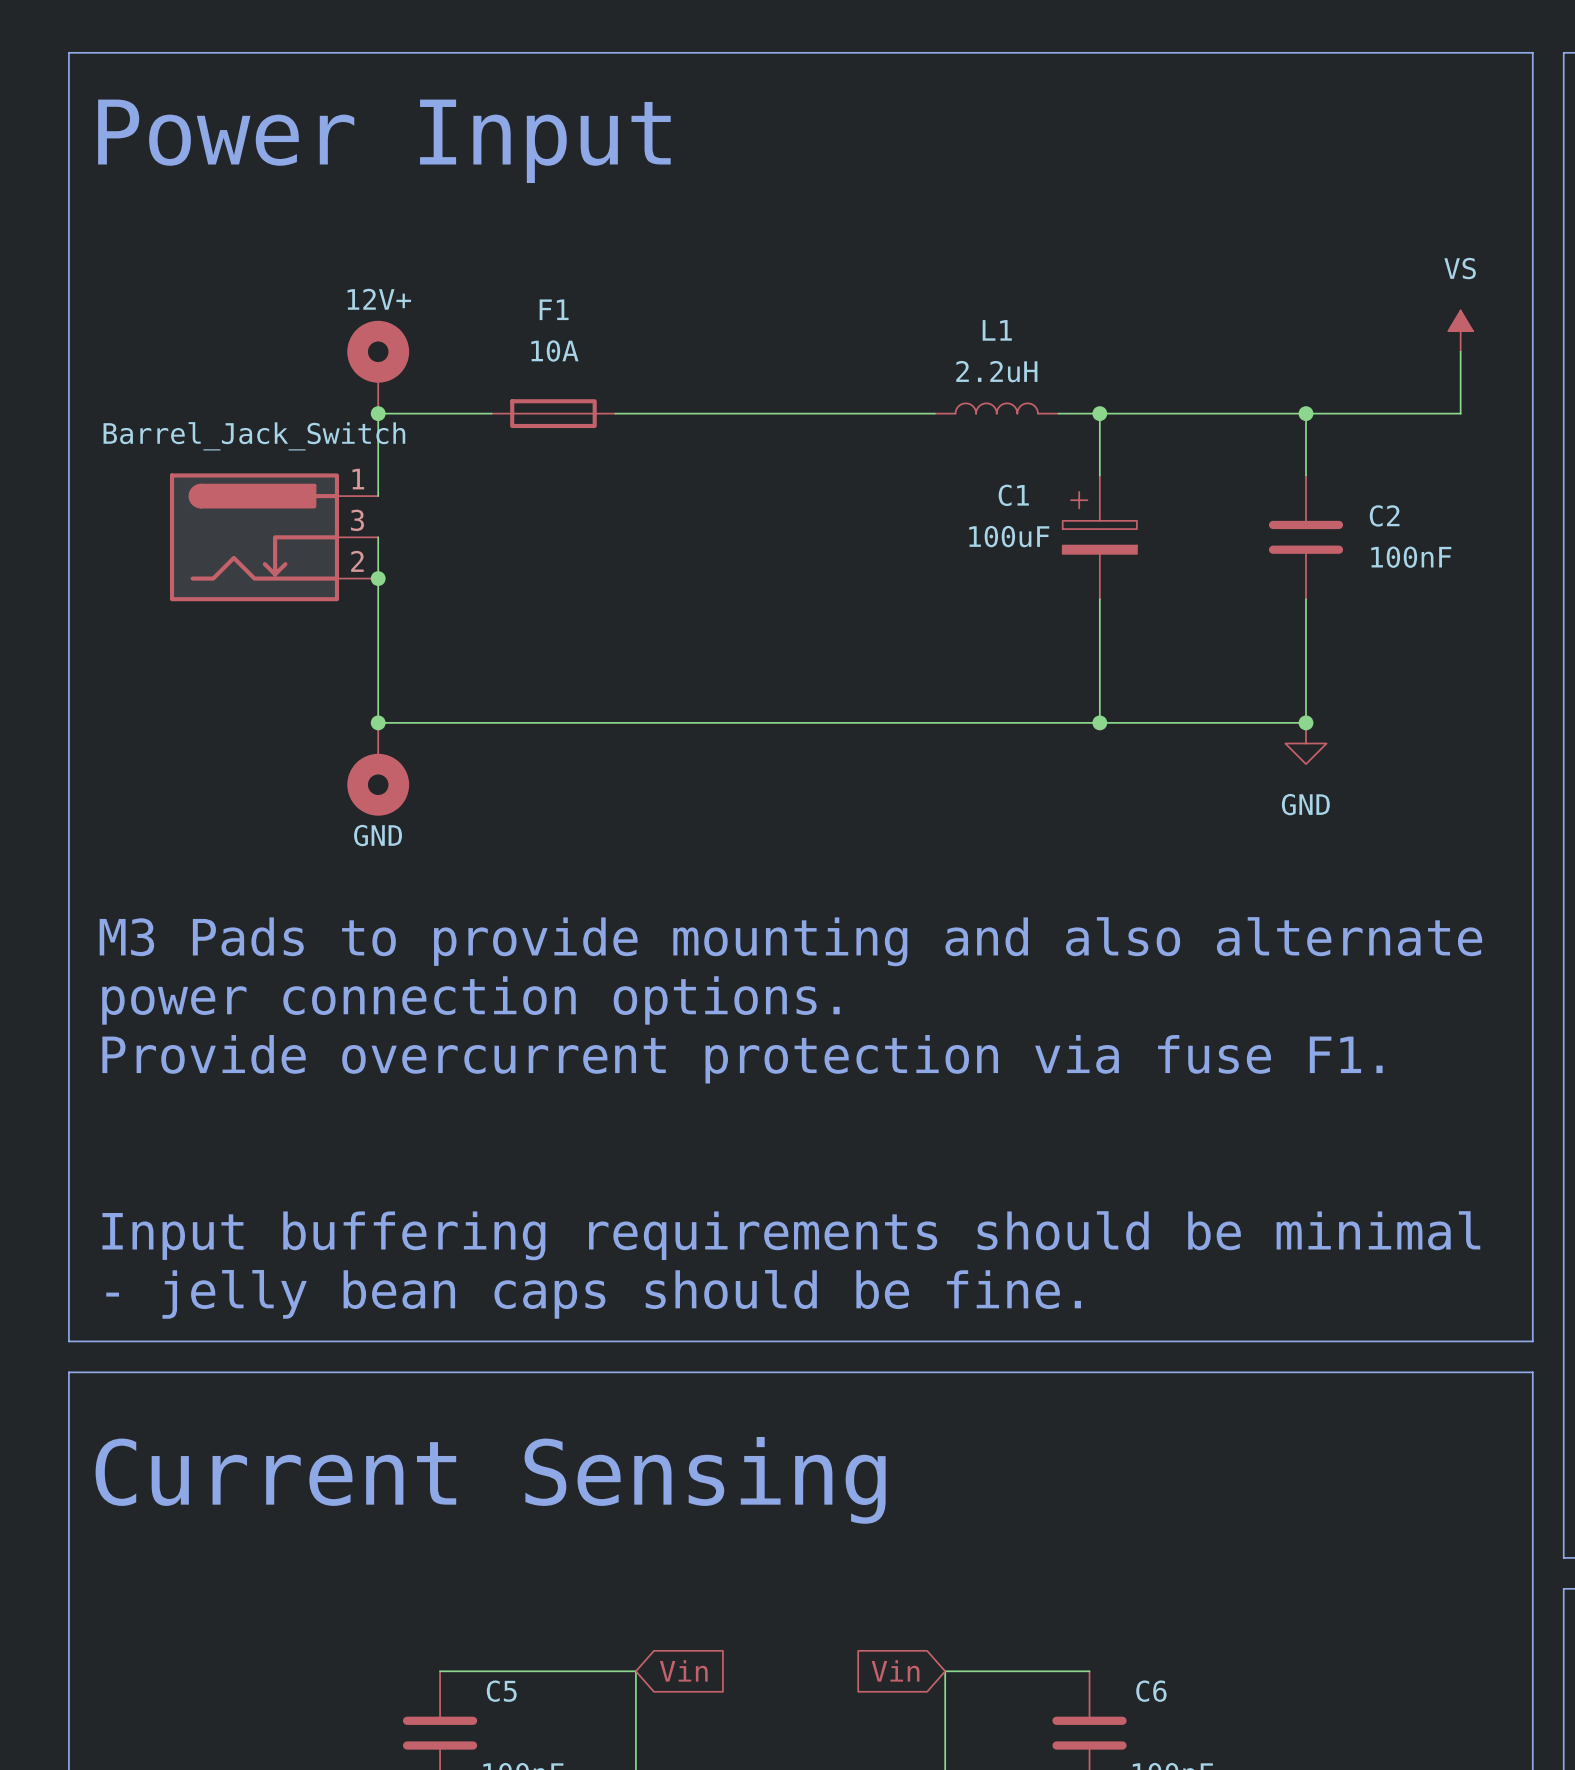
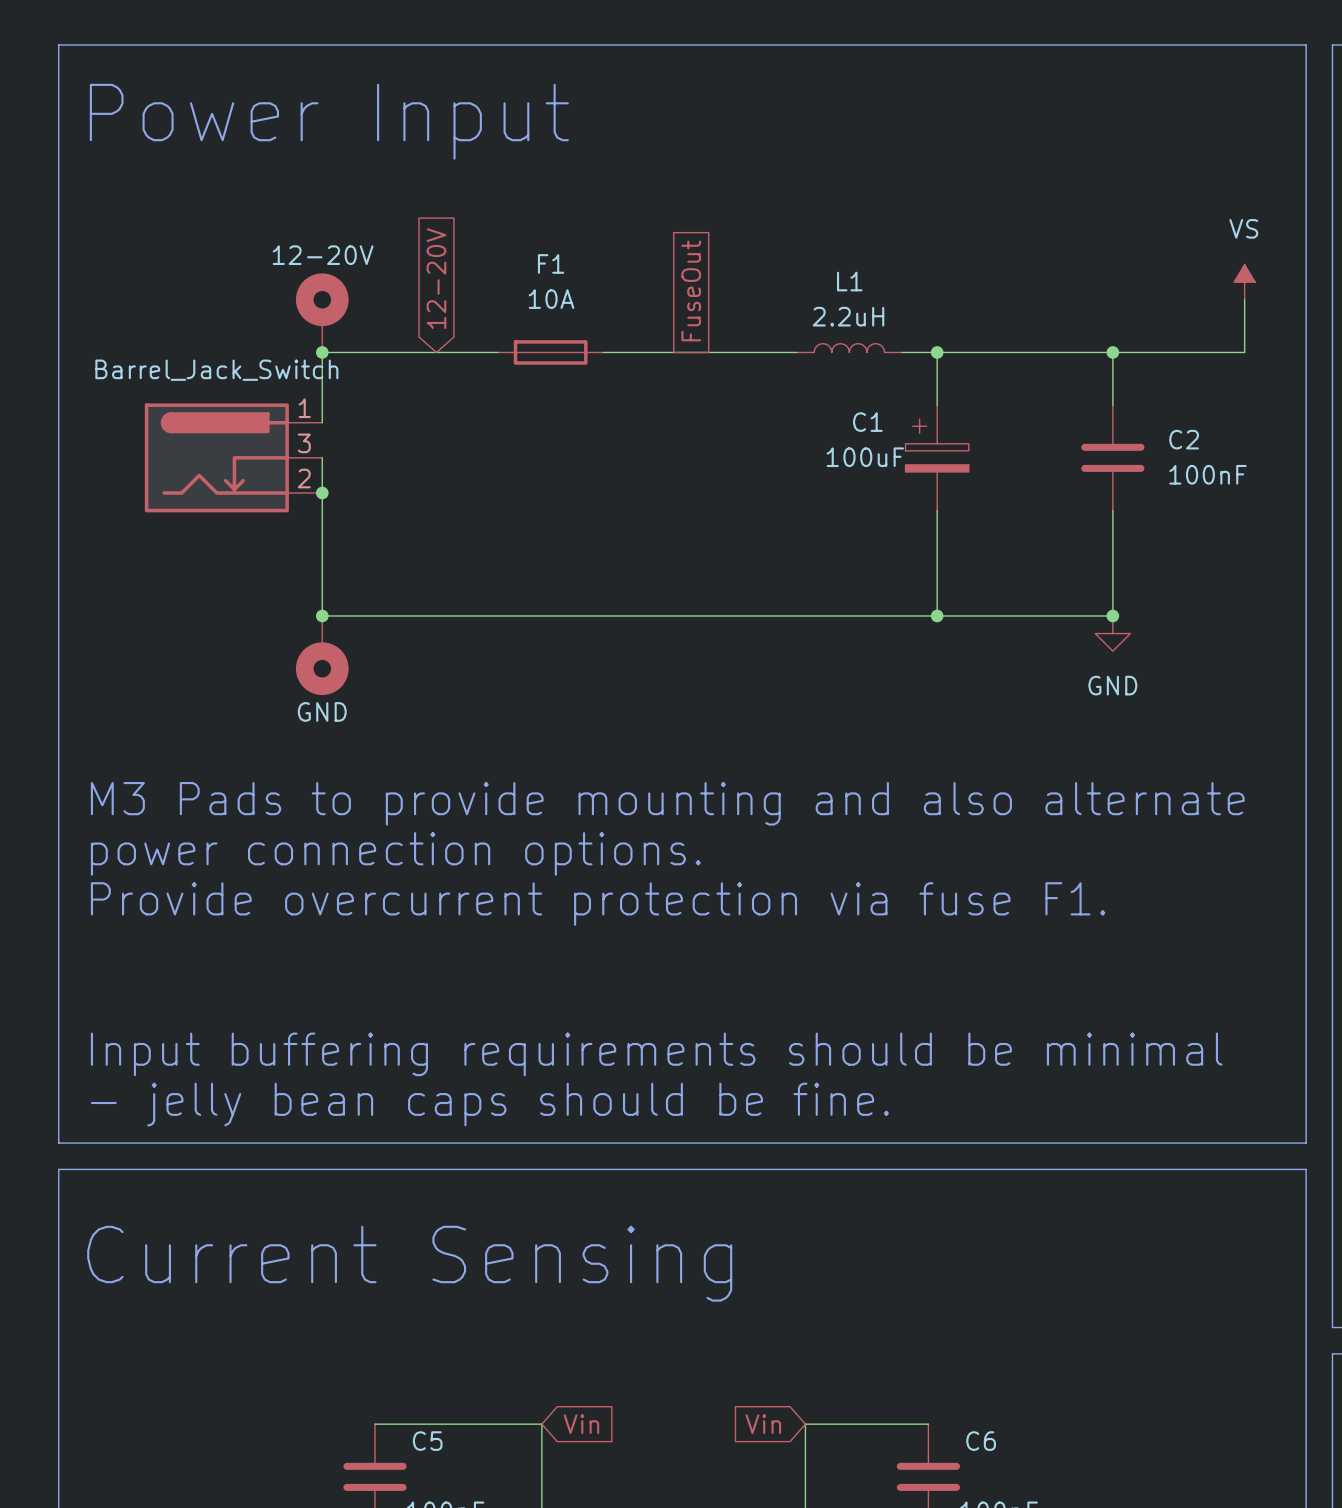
part text: 12V+ (379, 299) -> 12-20V (323, 255)
global label: none -> 12-20V (436, 278)
global label: none -> FuseOut (691, 290)
F1 position: (553, 413) -> (550, 352)

